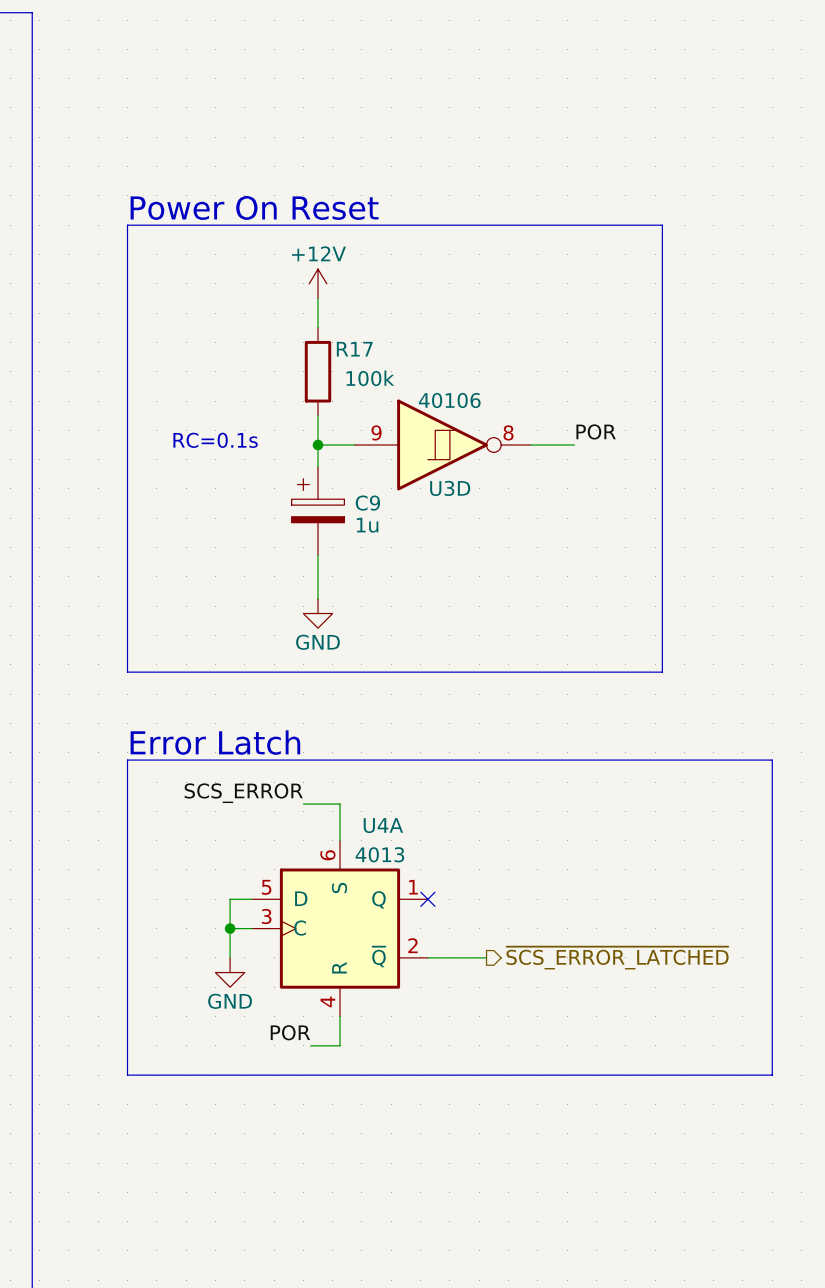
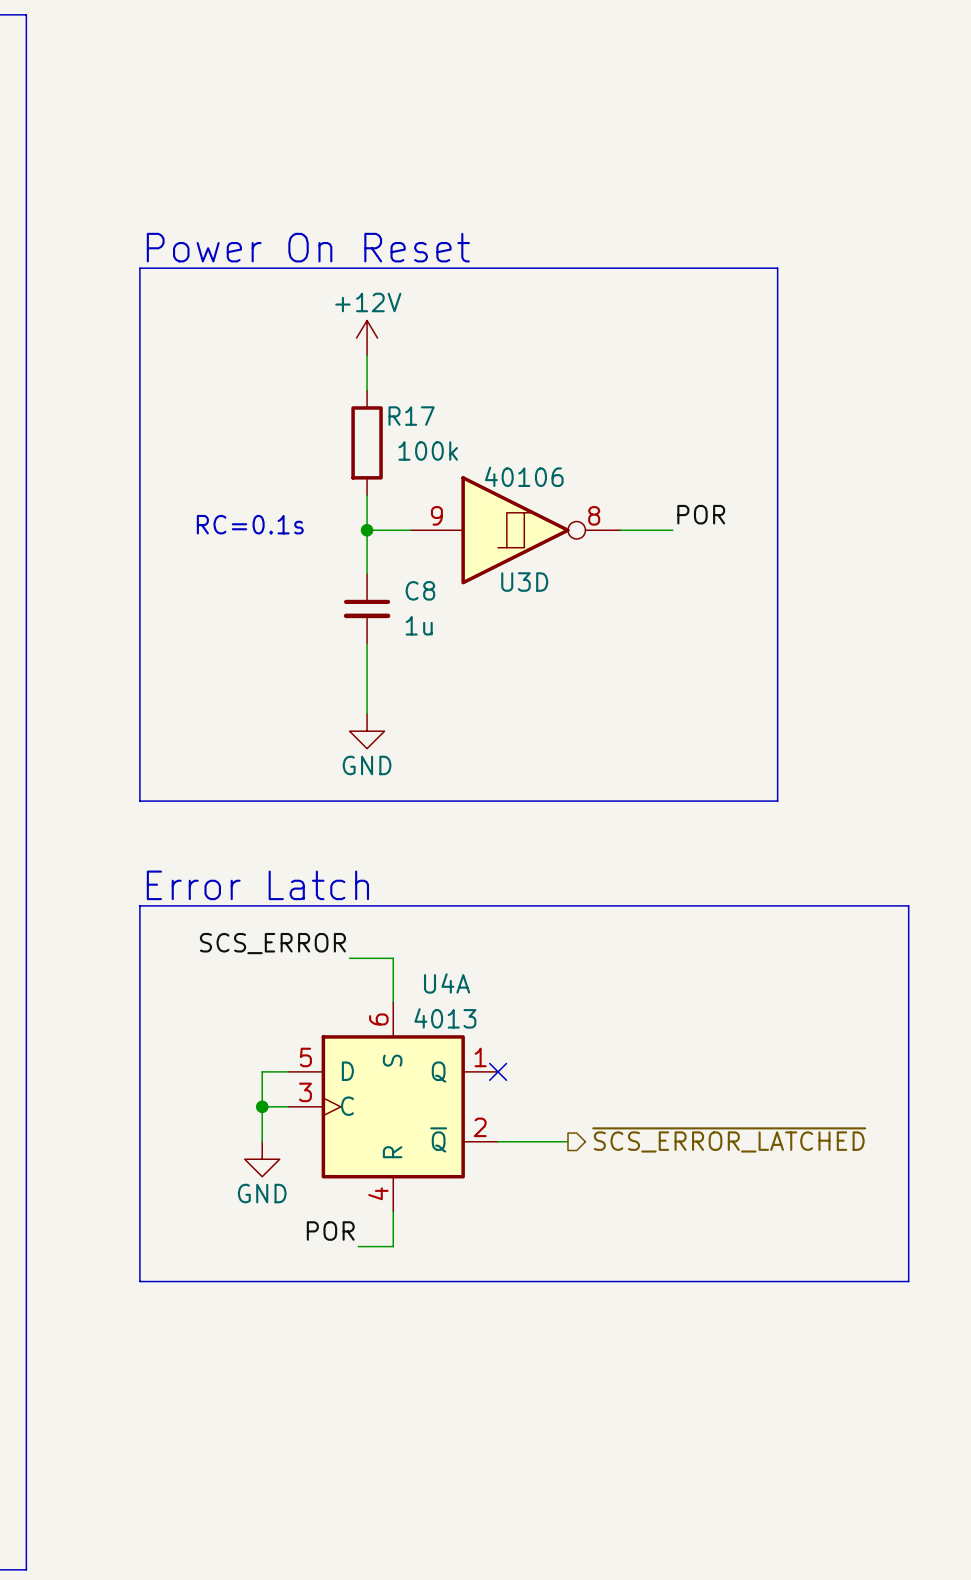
C9: 1u (318, 510) -> none
C8: none -> 1u (367, 608)

